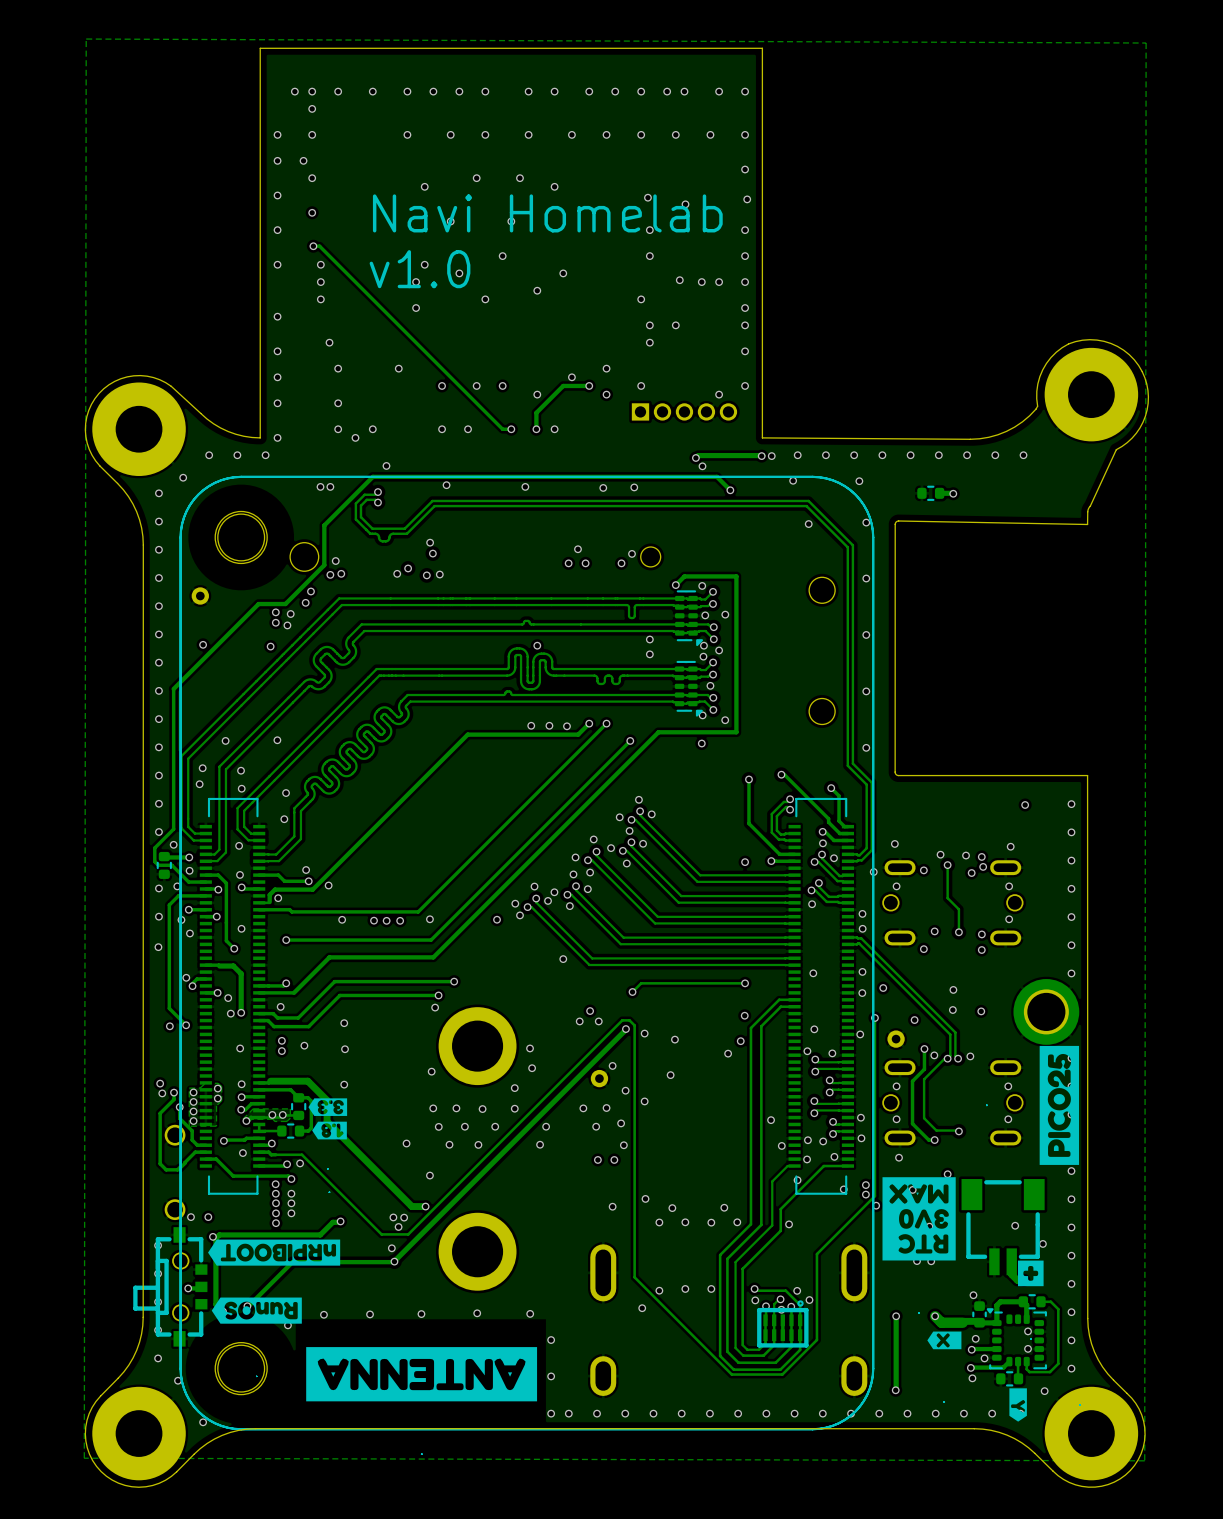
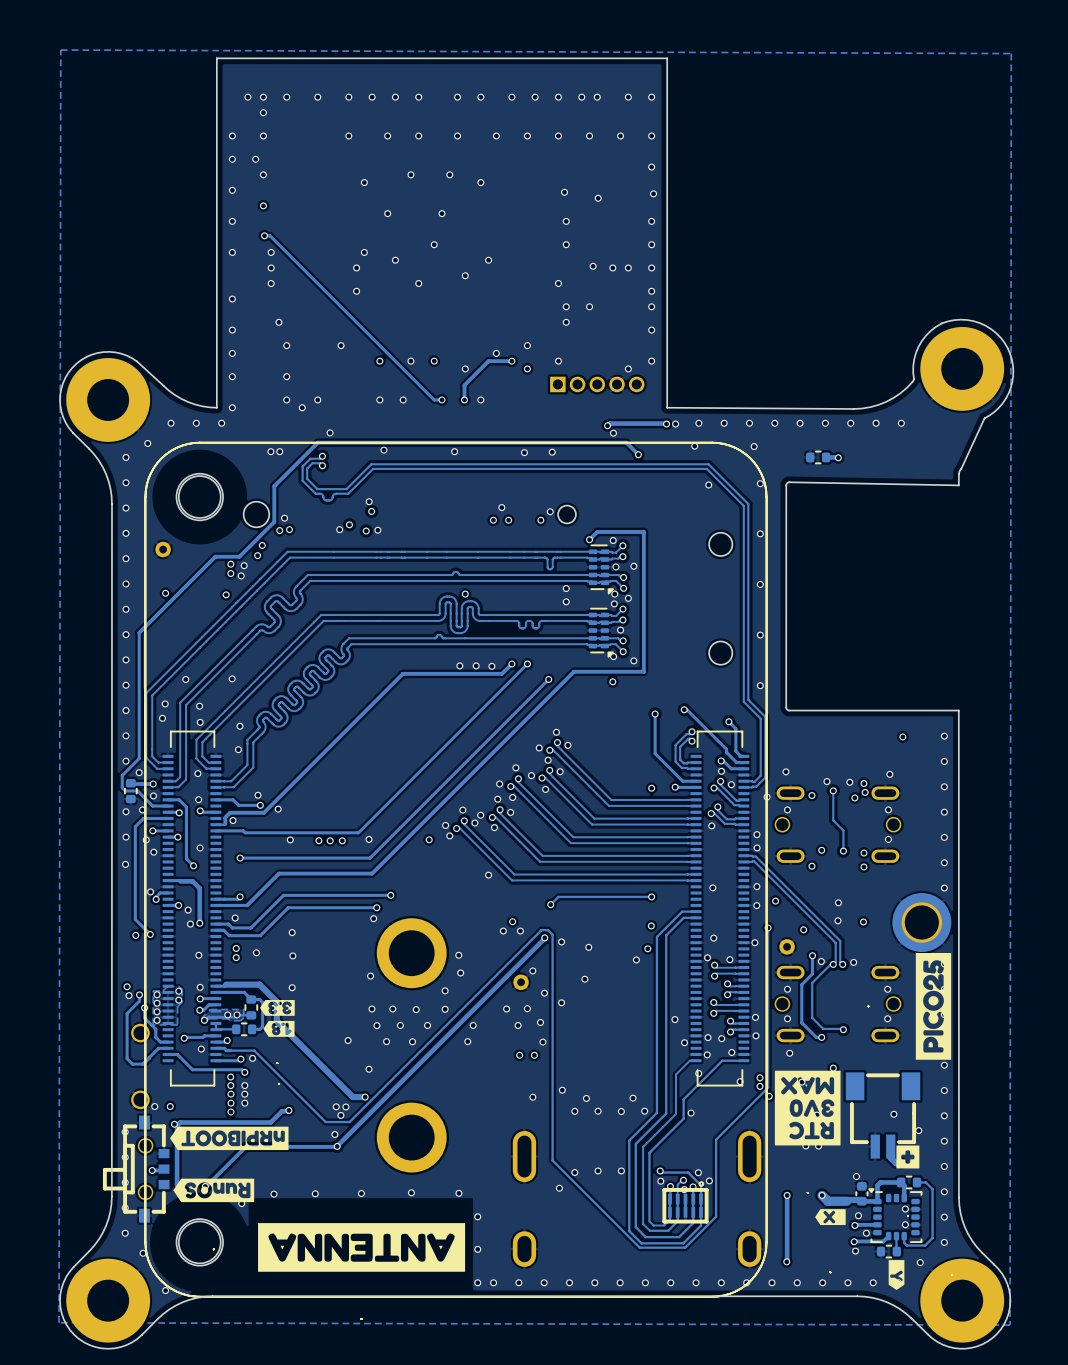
text: Navi Homelab (547, 213) -> none
text: v1.0 (420, 269) -> none

